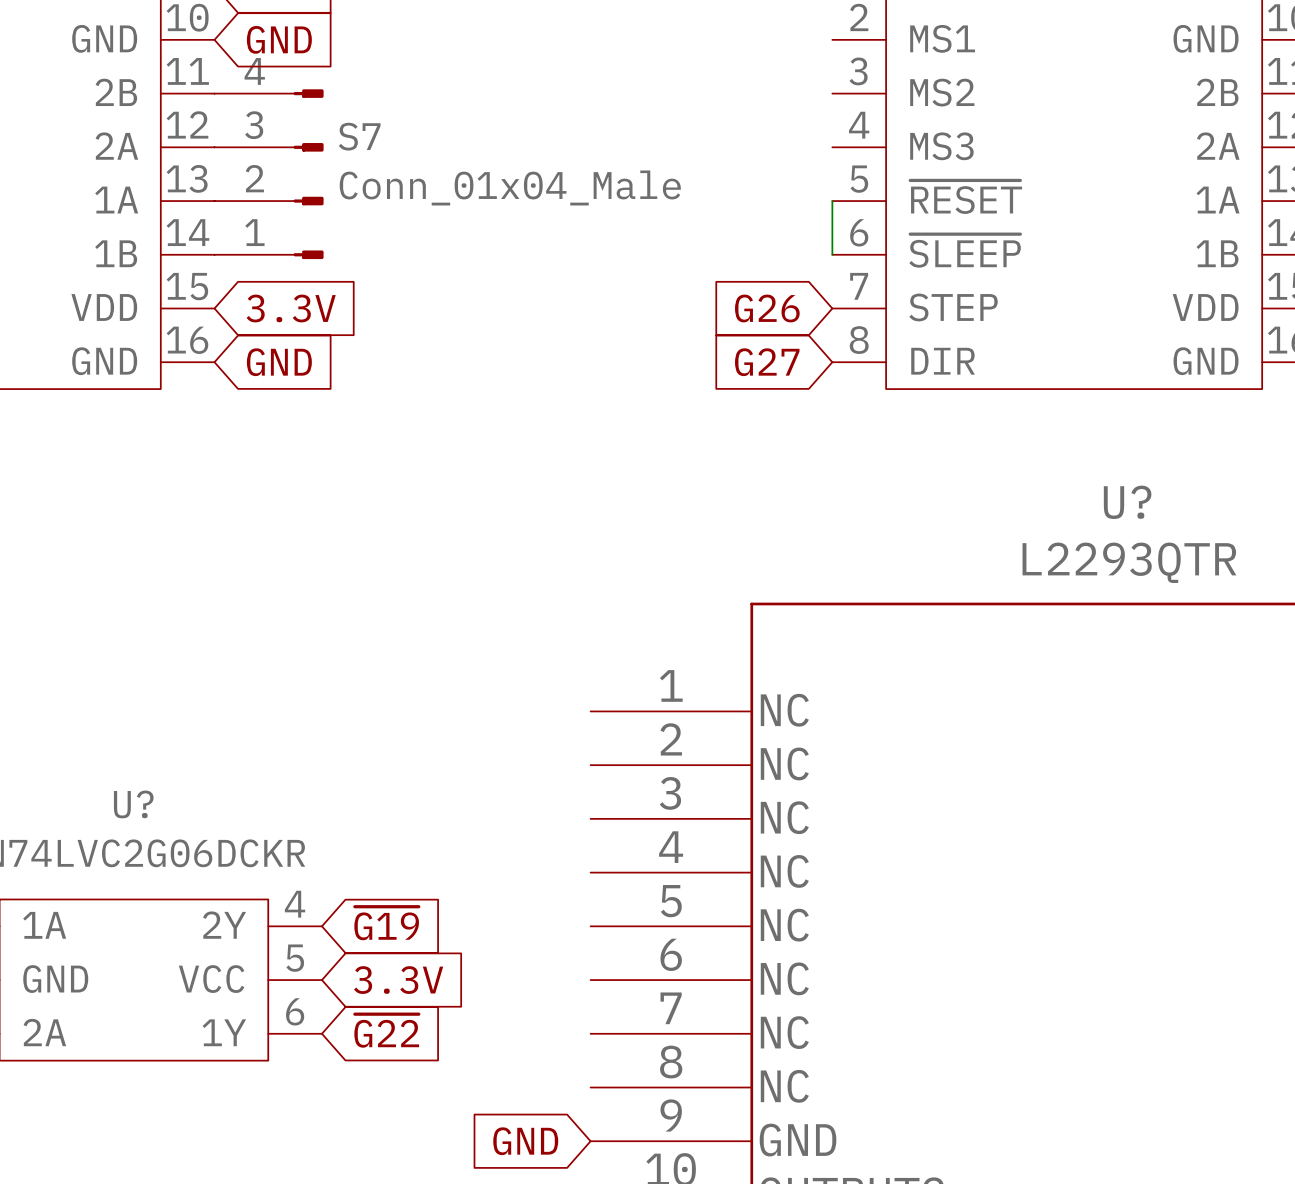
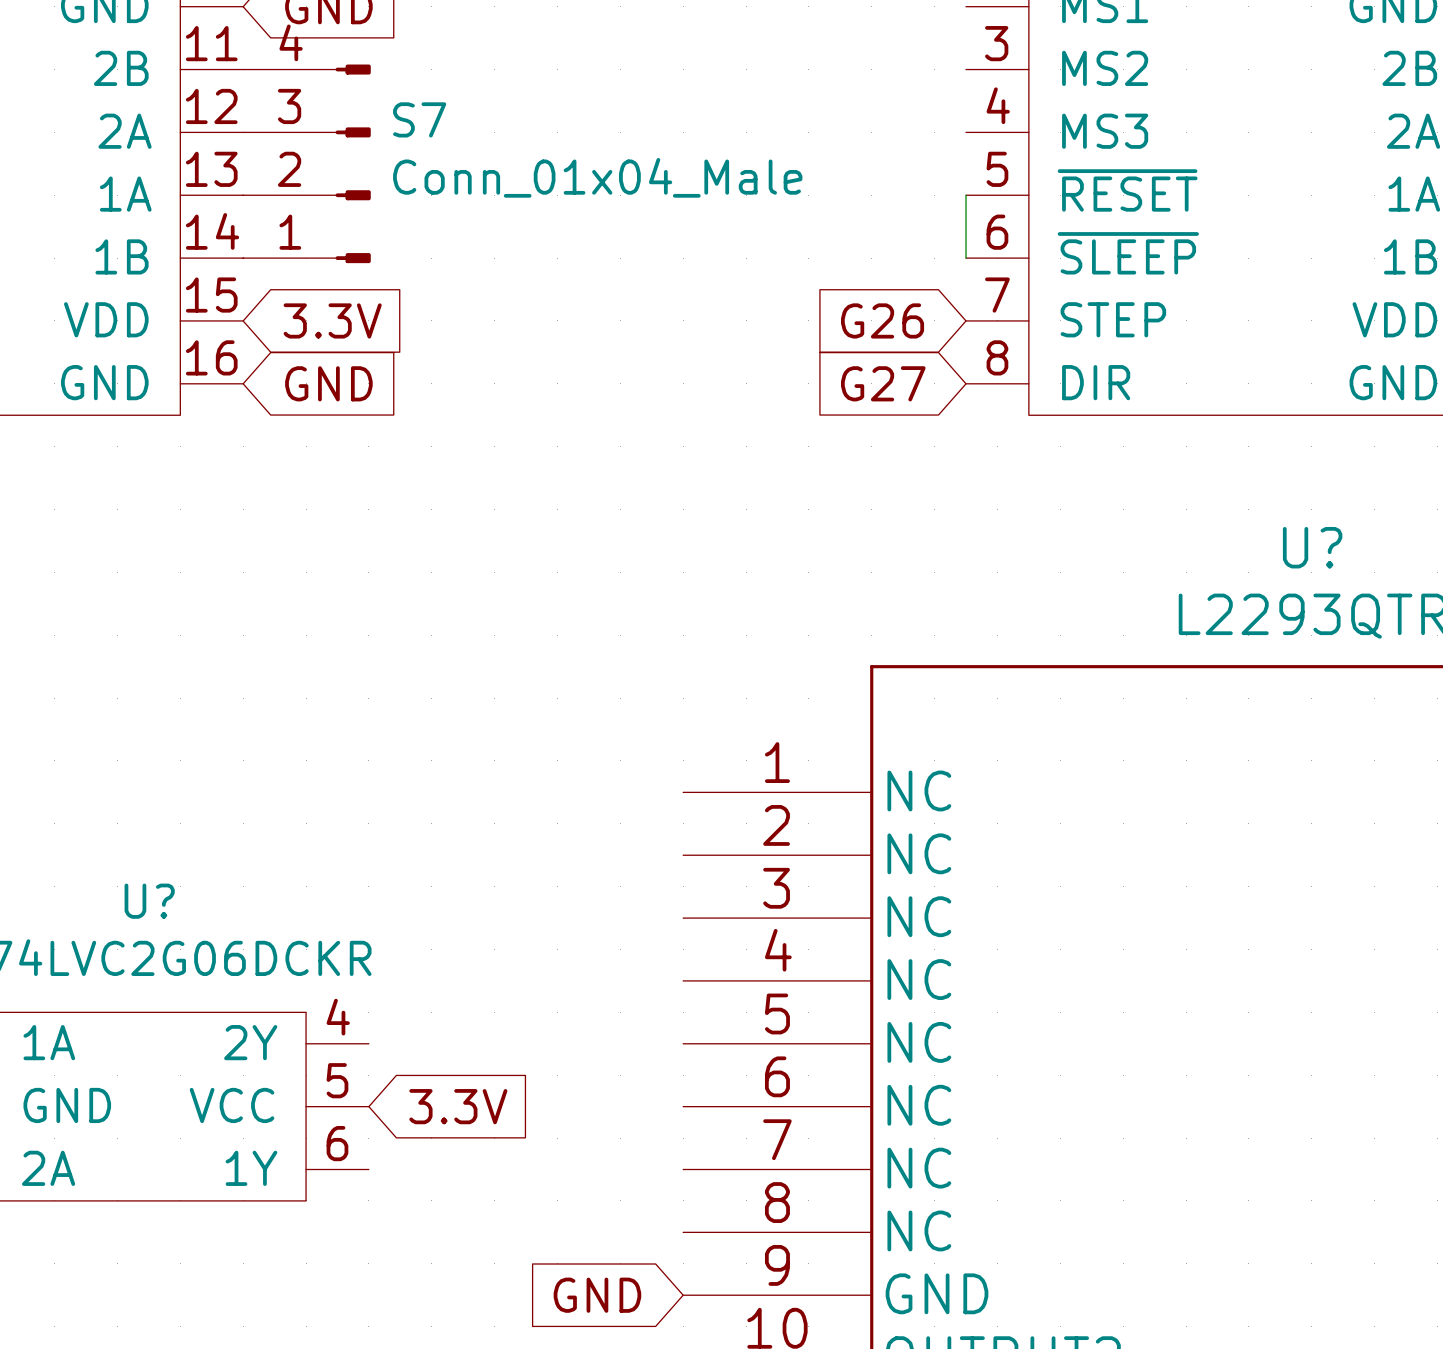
global label: ~{G19} (386, 923) -> none
global label: ~{G22} (386, 1030) -> none

